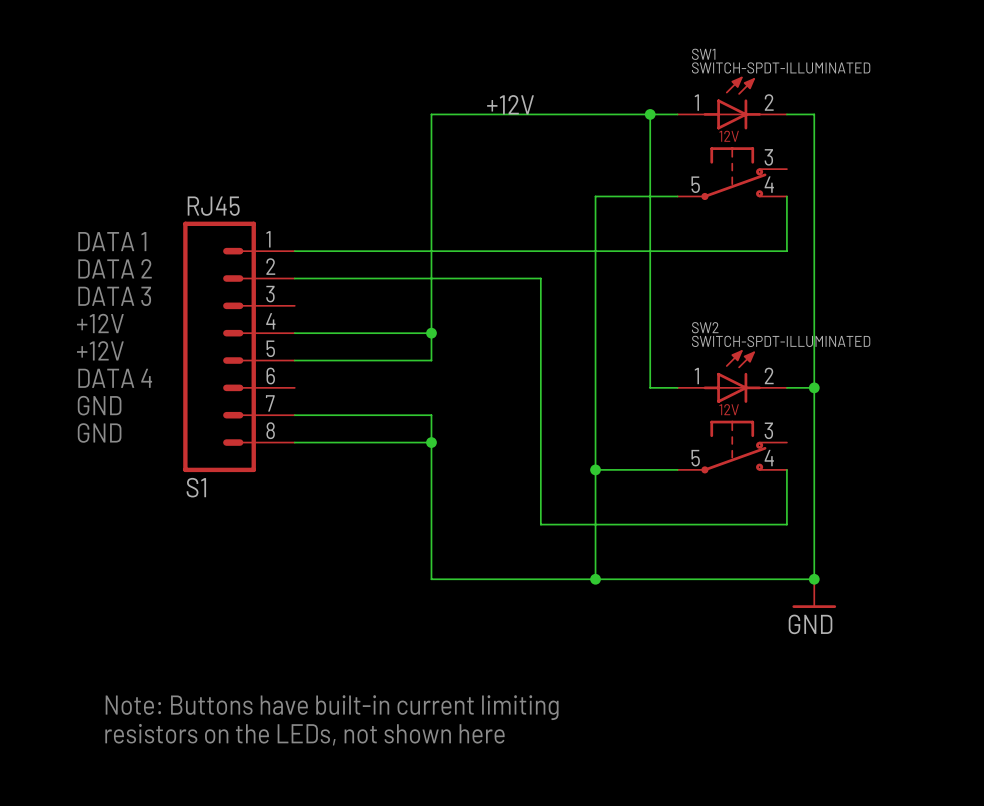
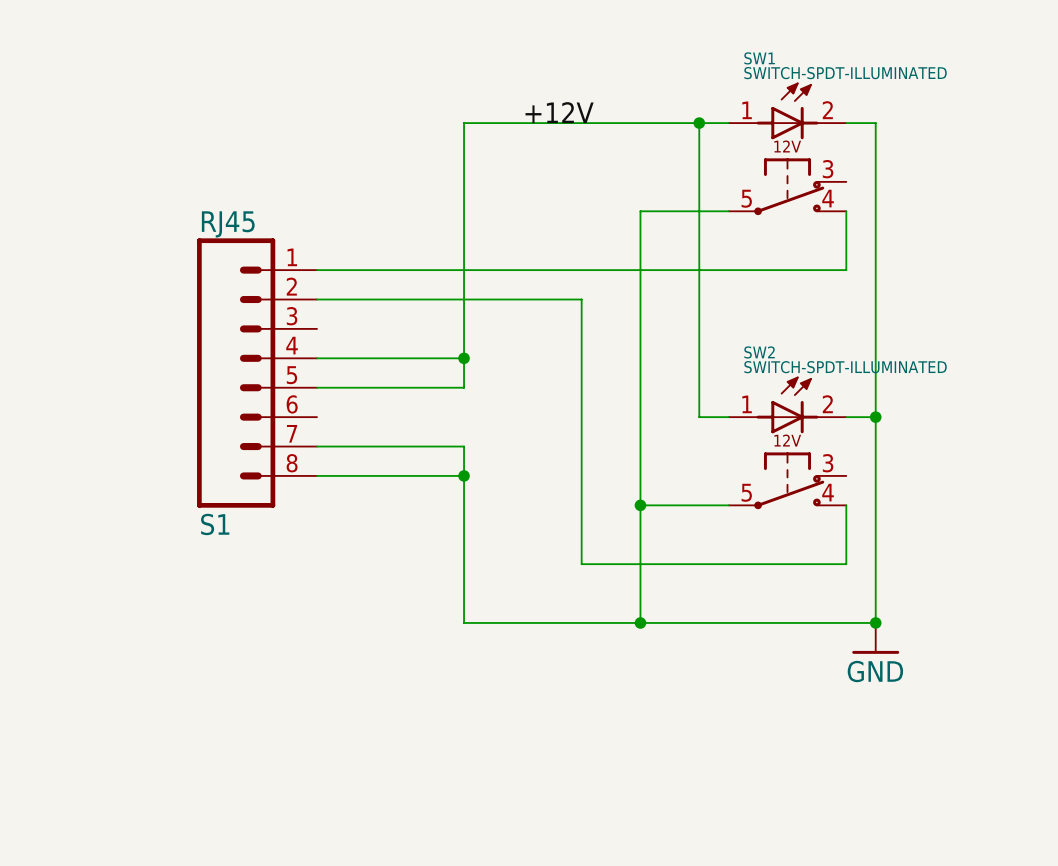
text: DATA 1 (112, 241) -> none
text: DATA 2 (115, 268) -> none
text: DATA 3 (114, 296) -> none
text: +12V (100, 323) -> none
text: +12V (100, 350) -> none
text: DATA 4 (115, 378) -> none
text: GND (99, 405) -> none
text: GND (99, 432) -> none
text: Note: Buttons have built-in current limiting (332, 707) -> none
text: resistors on the LEDs, not shown here (304, 734) -> none

